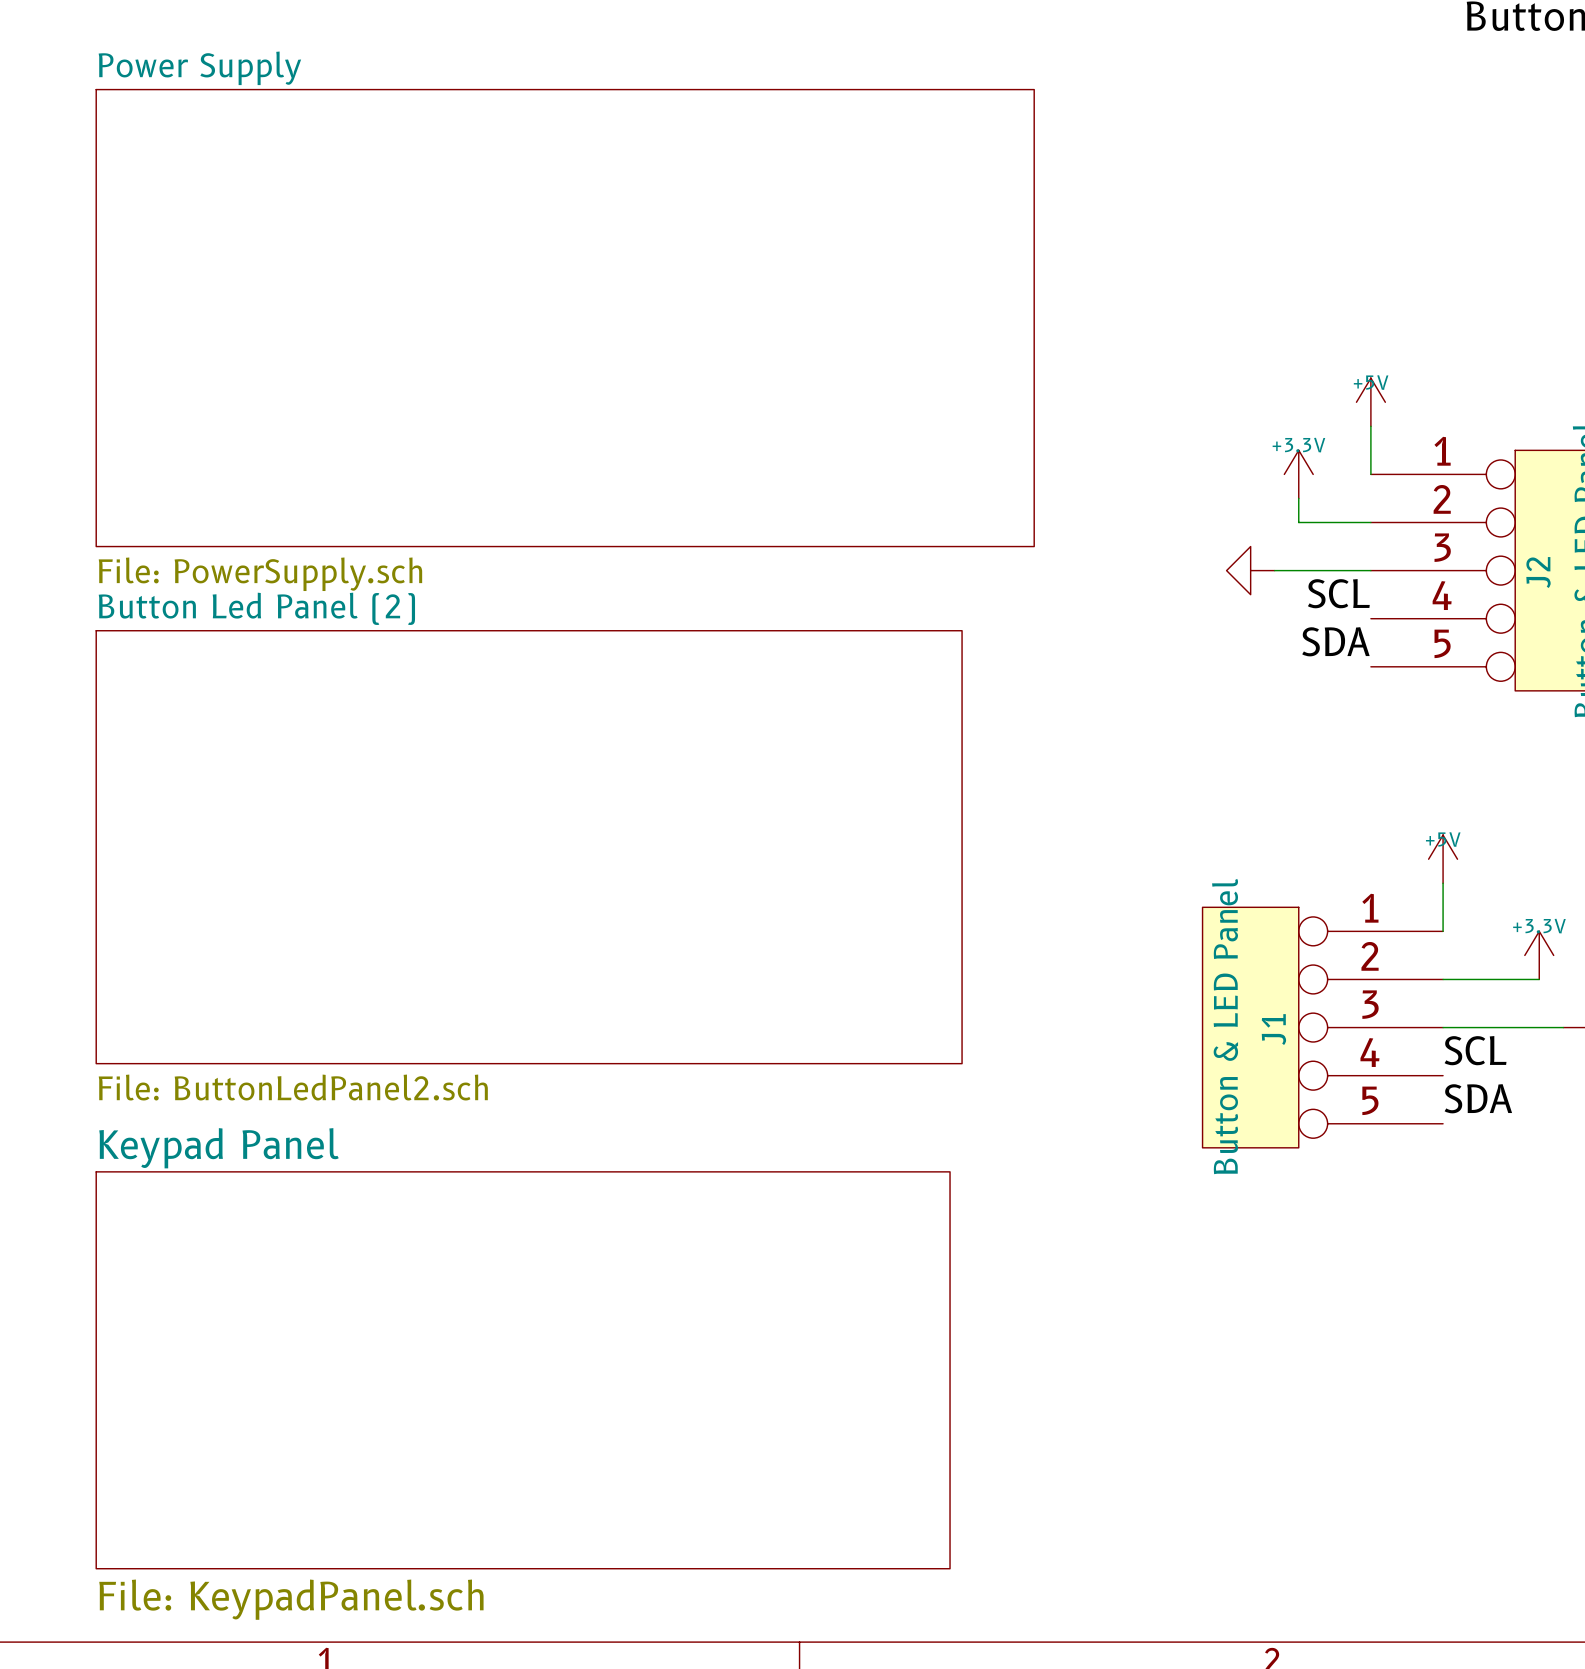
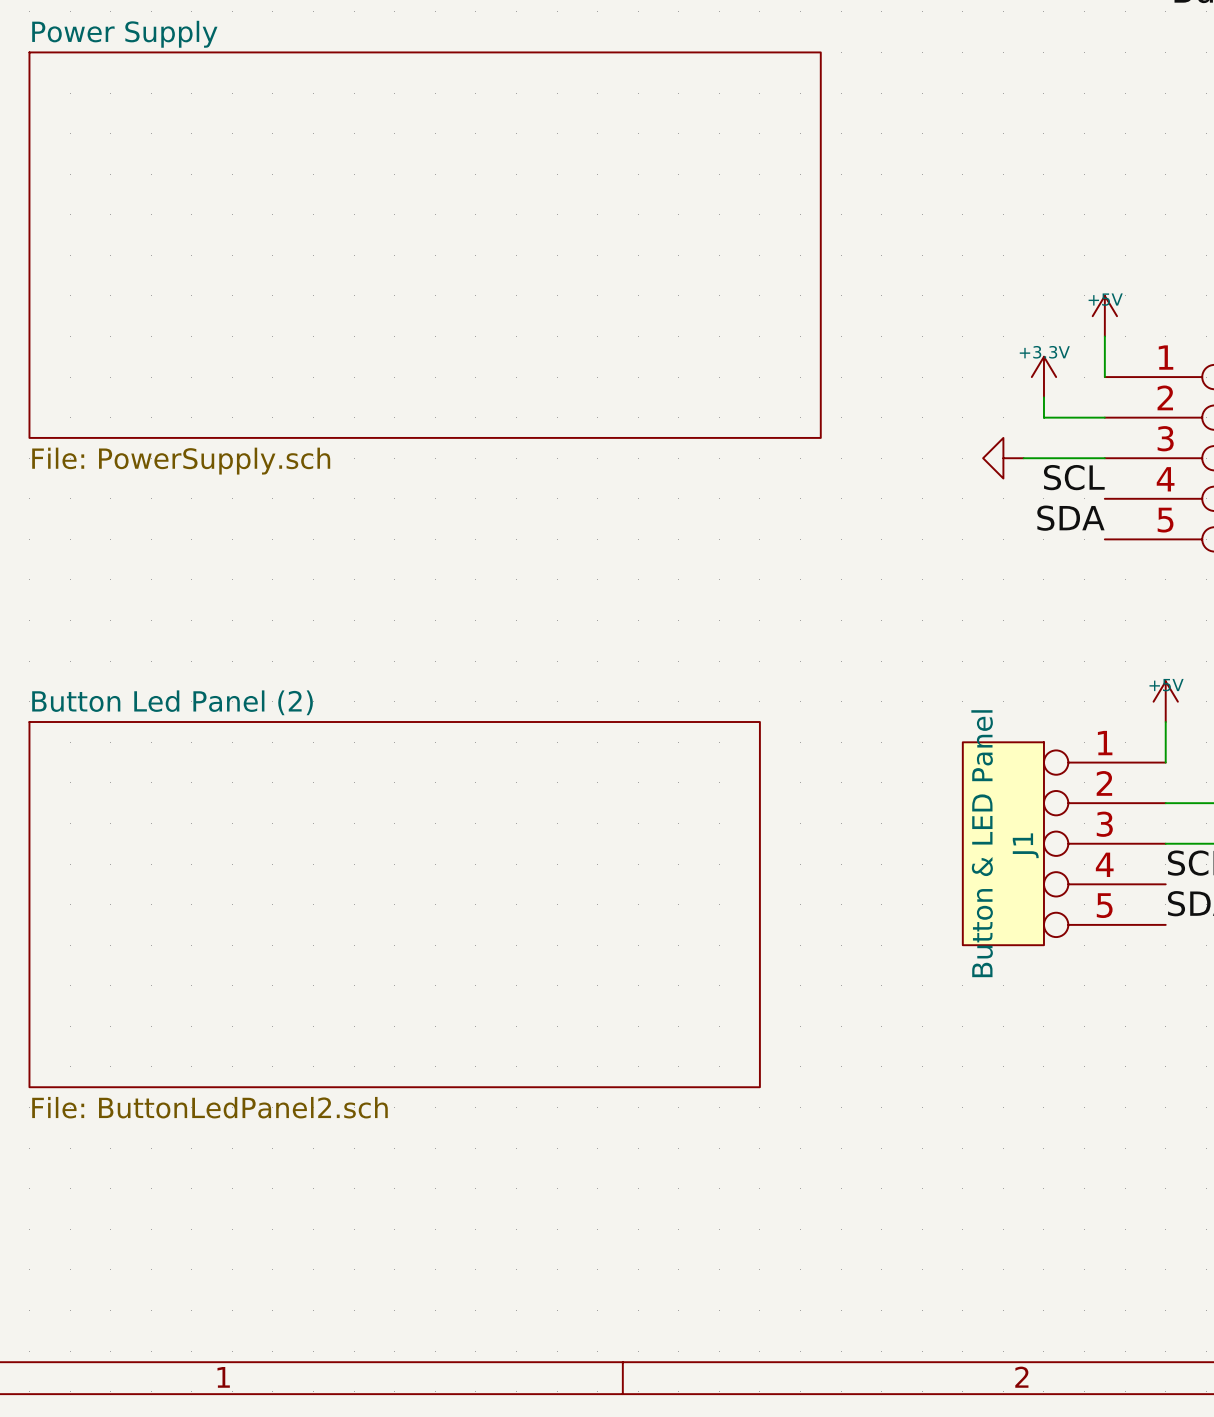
sheet Button Led Panel (2) position: (529, 847) -> (394, 904)
sheet Keypad Panel: File: KeypadPanel.sch (523, 1370) -> none

